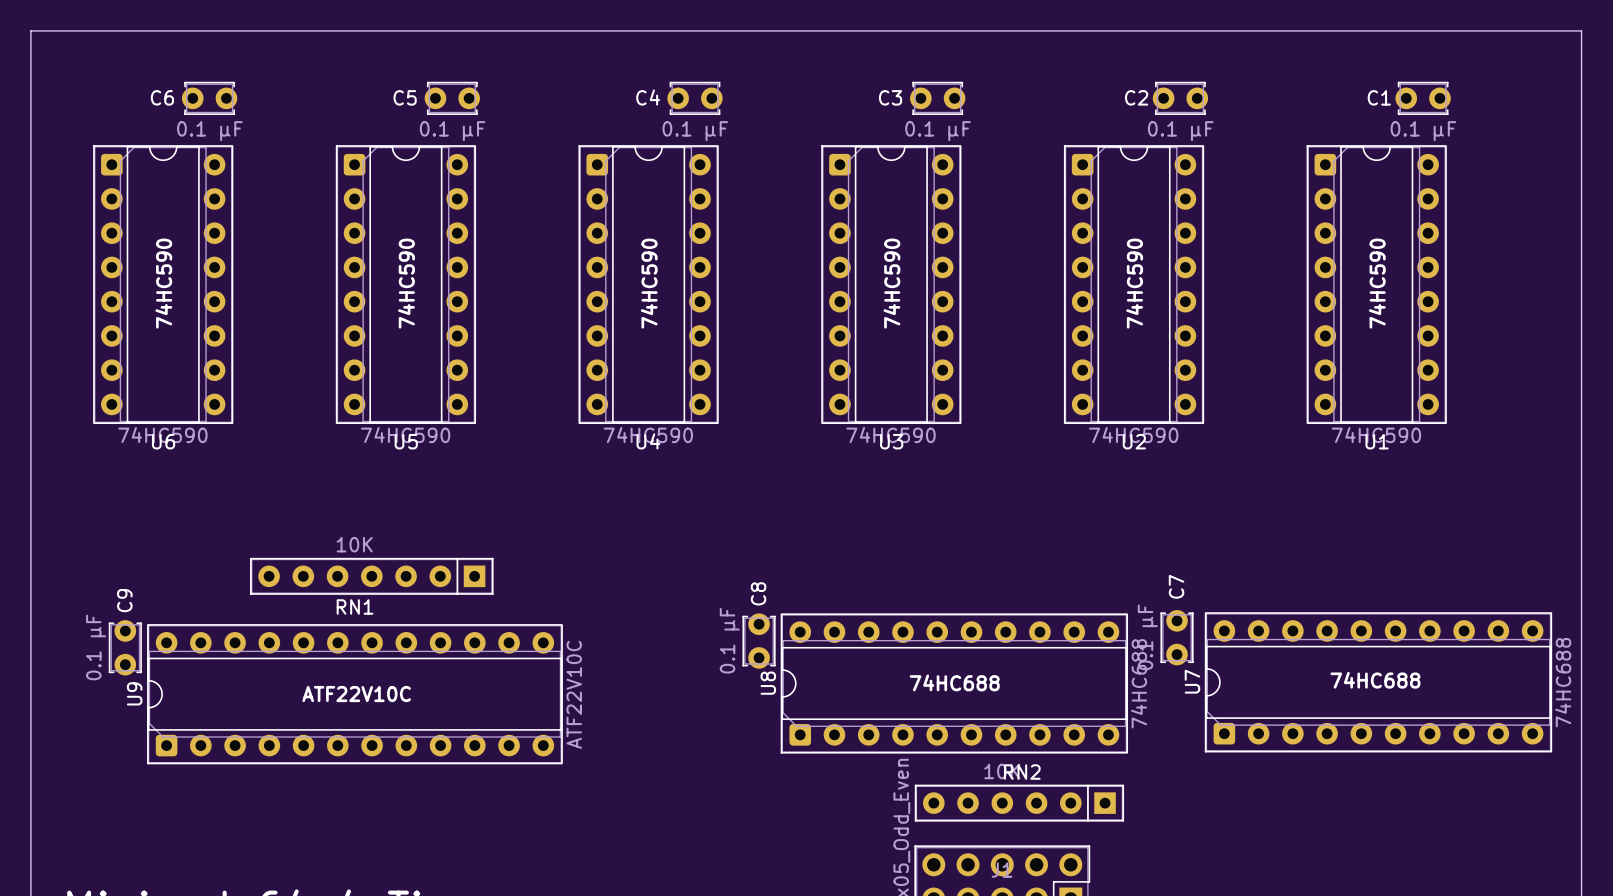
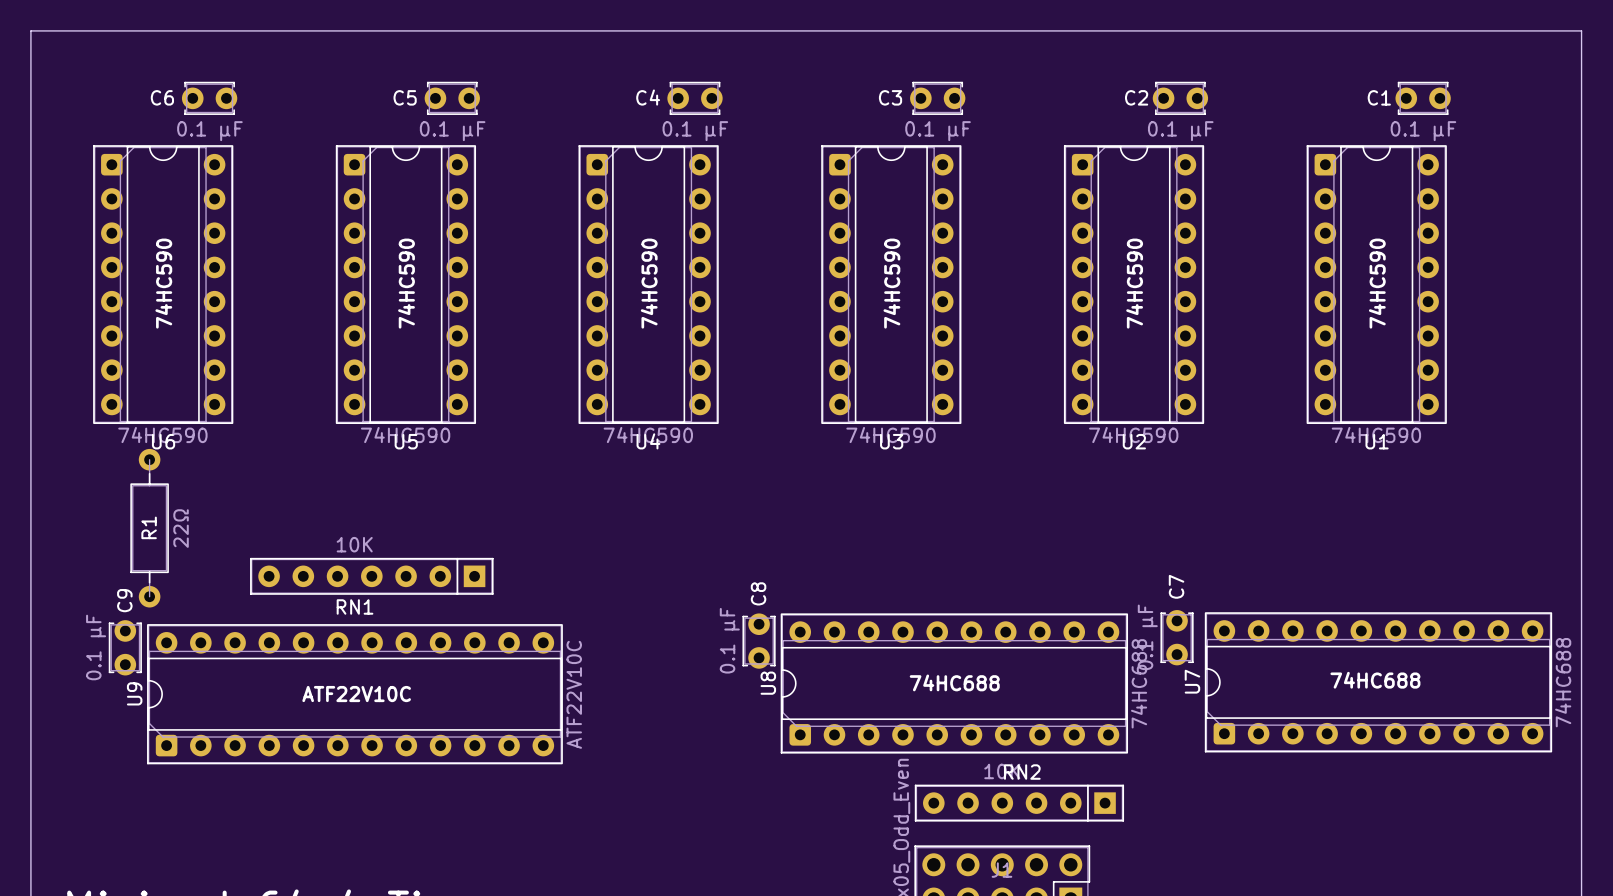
R1: none -> 22Ω (149, 528)

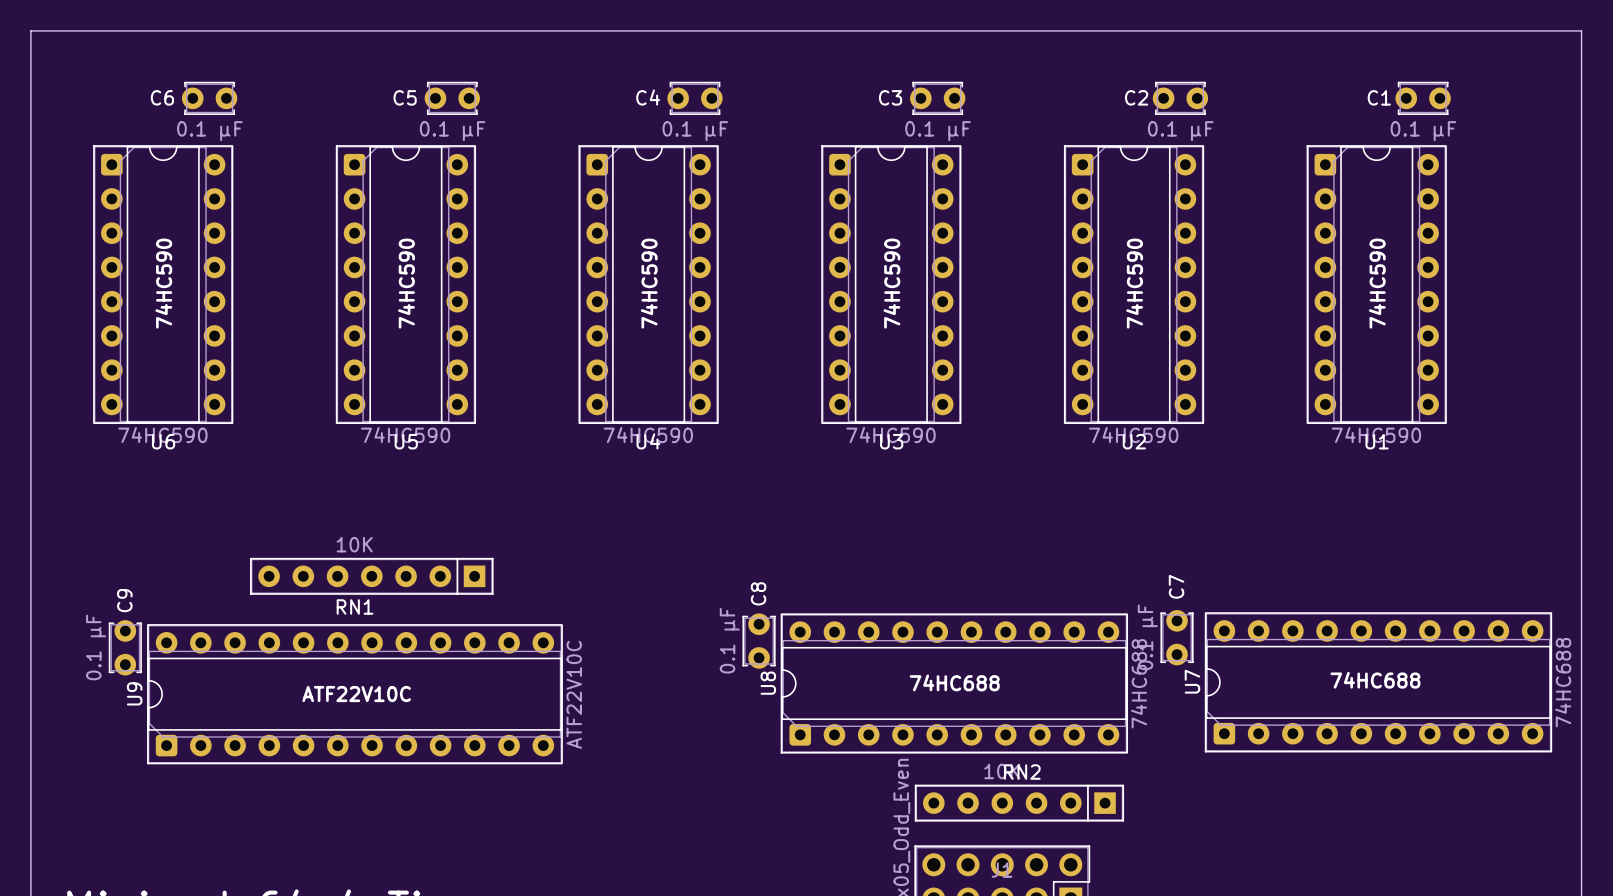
R1: 22Ω (149, 528) -> none

